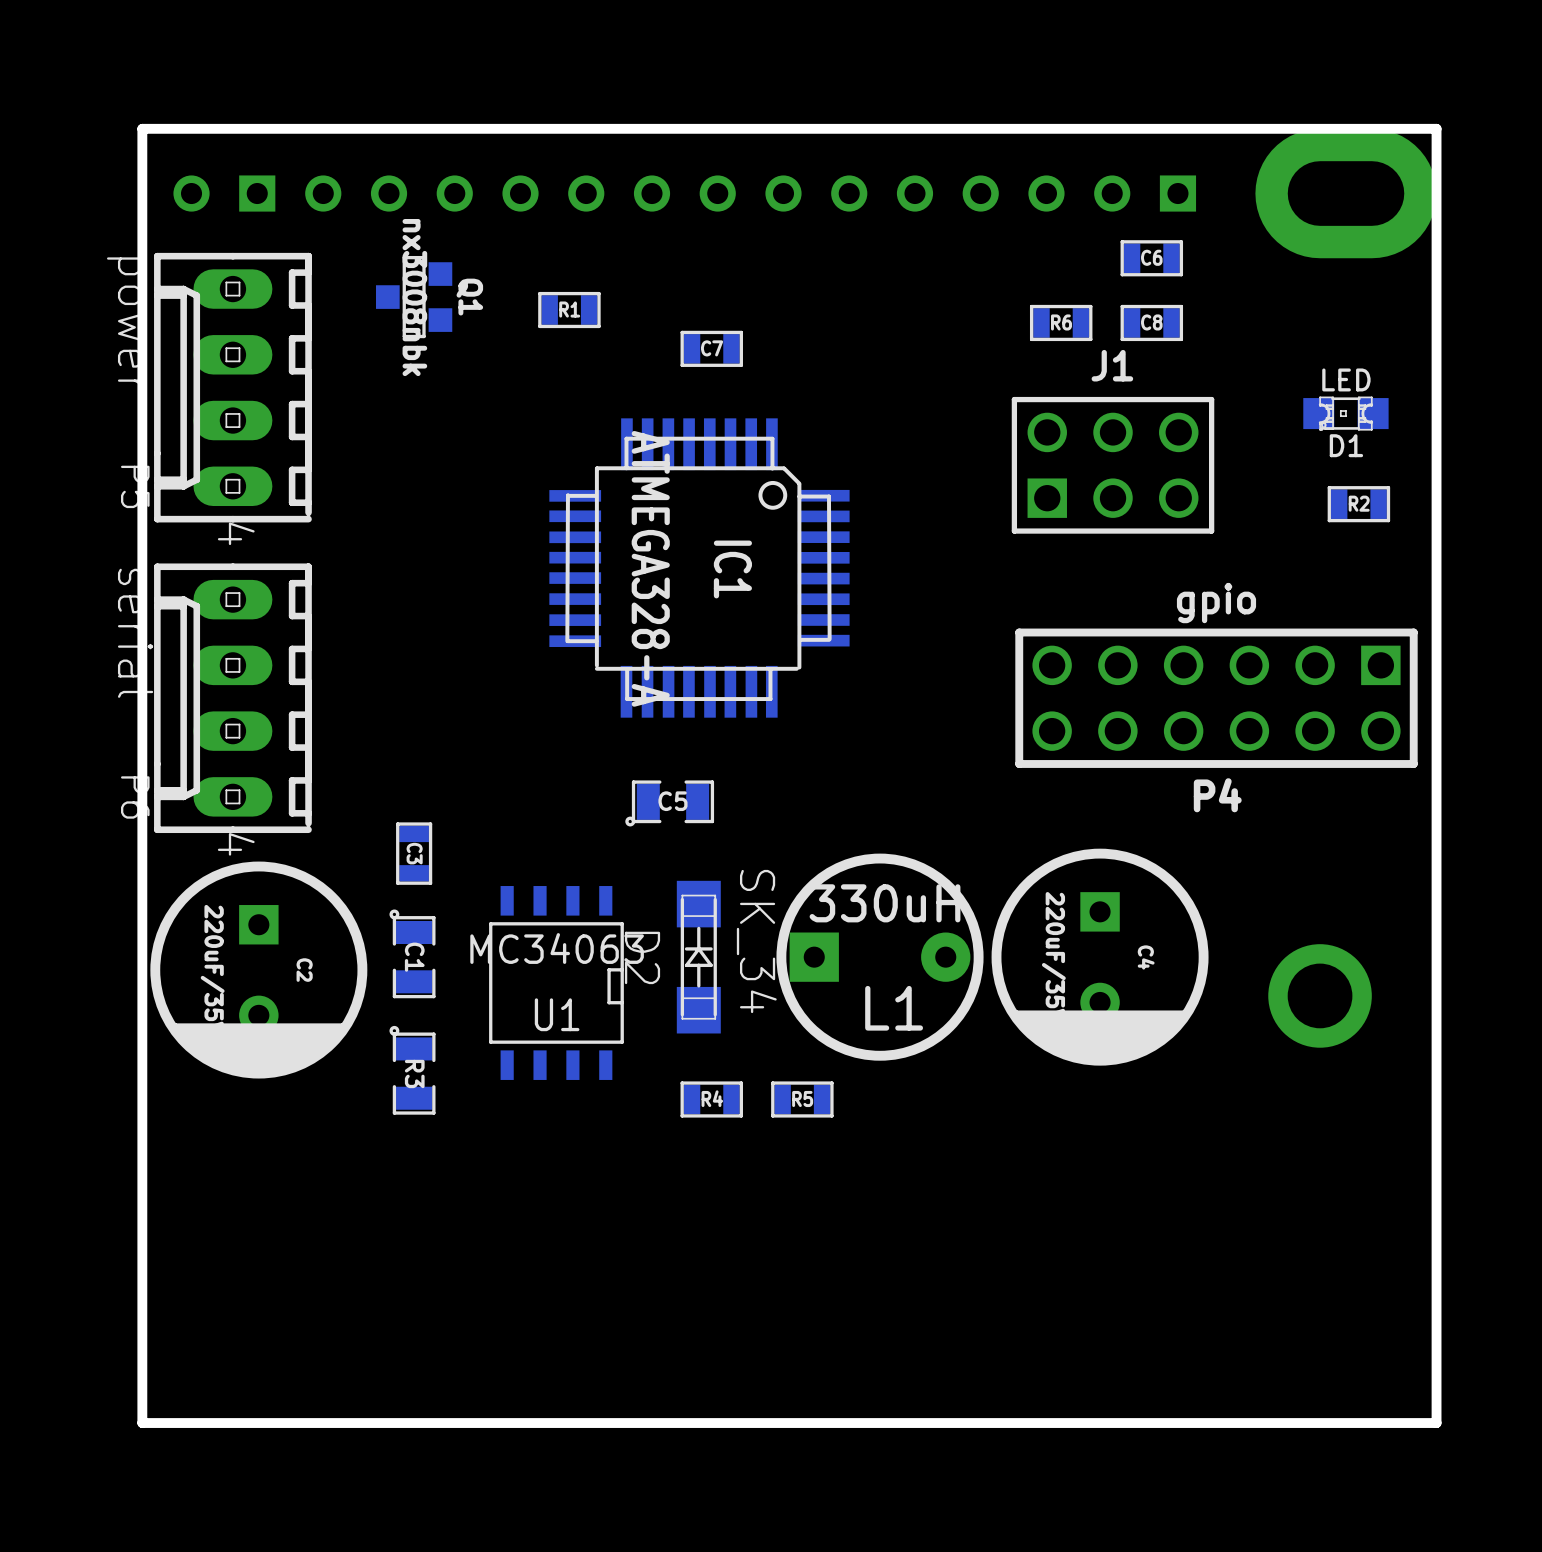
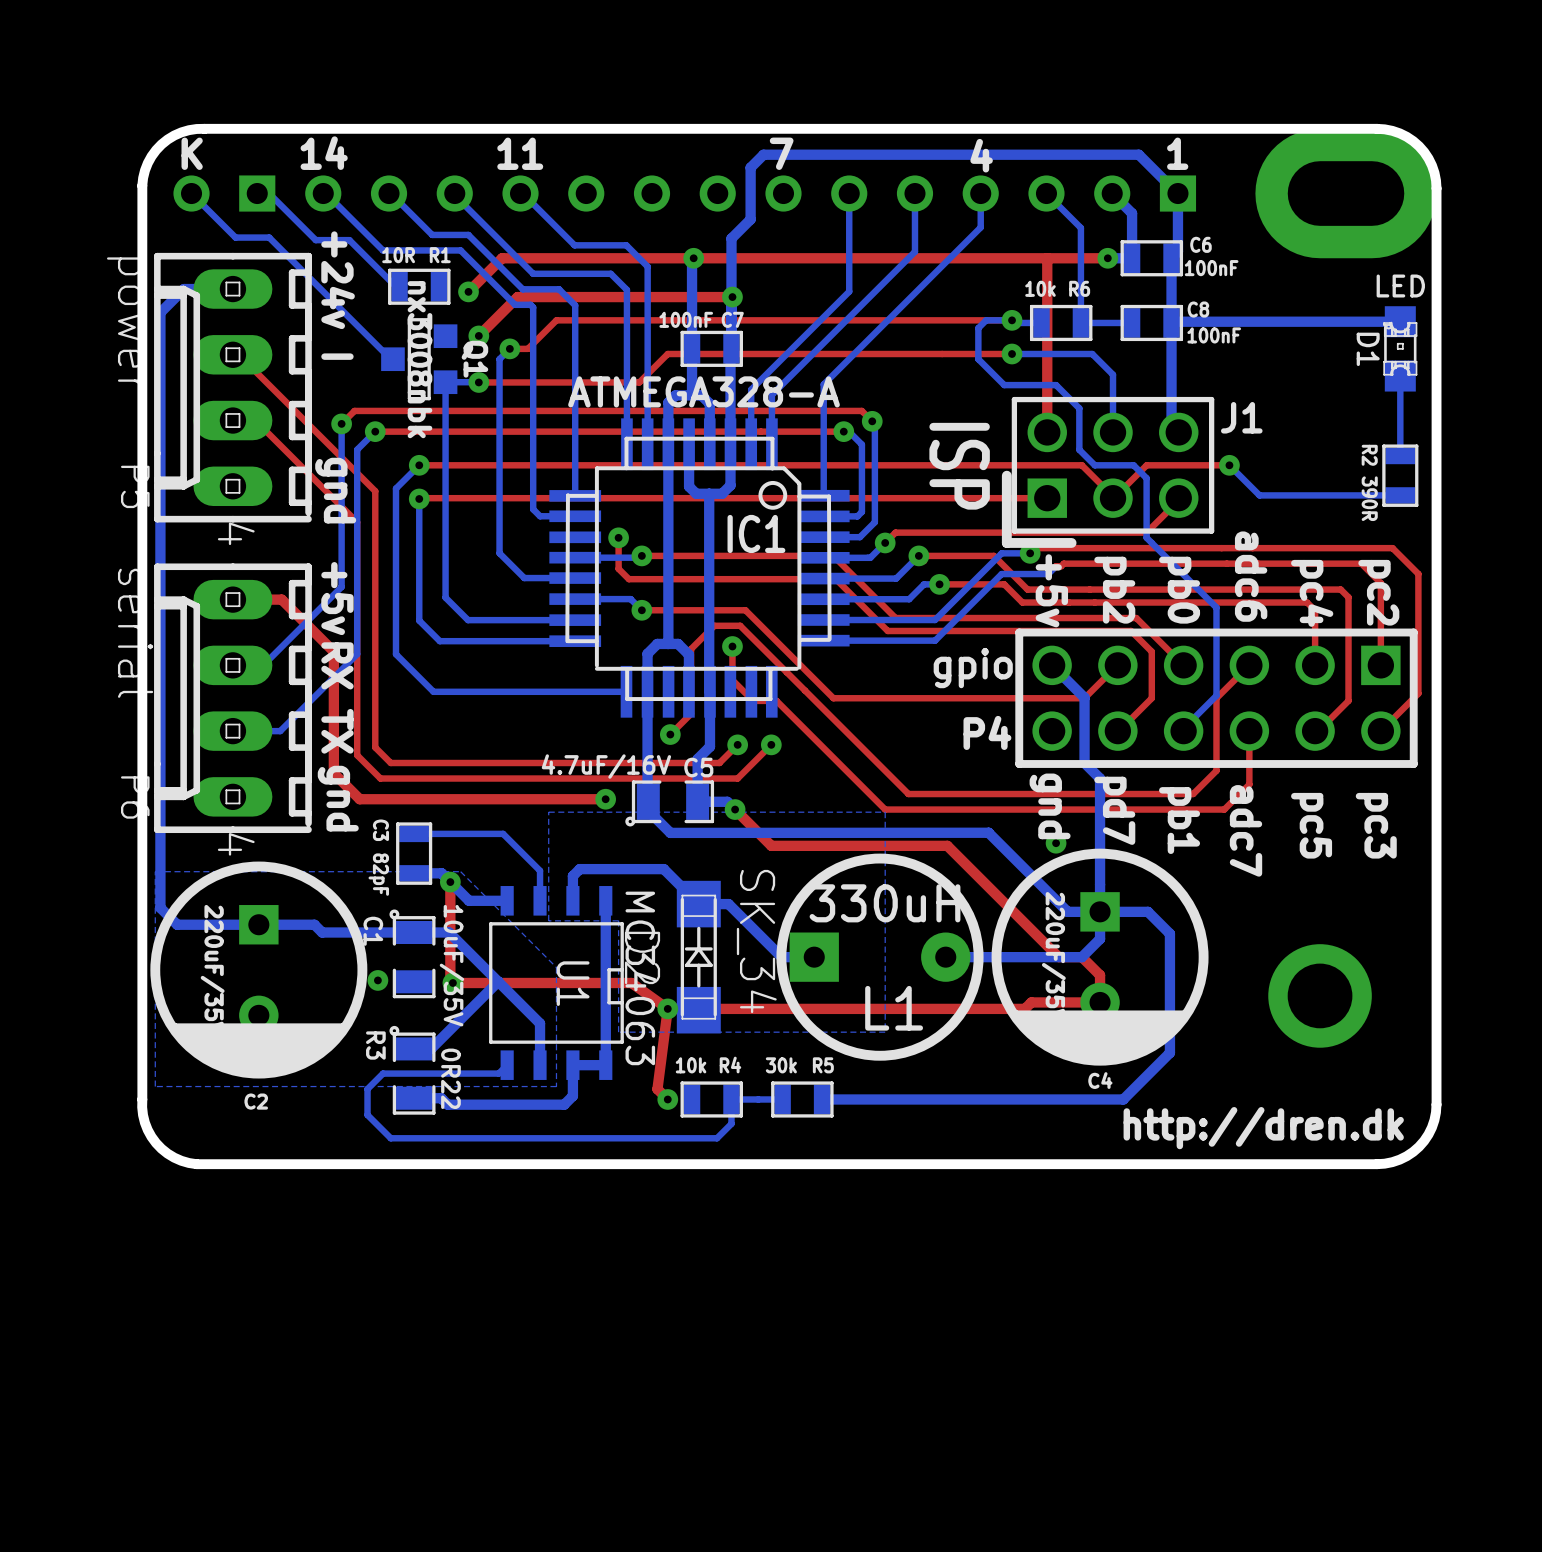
board edge: (204, 128) (142, 128) (142, 185) -> (204, 128) (181, 132) (161, 144) (147, 163) (142, 185)
board edge: (1376, 128) (1436, 128) (1436, 188) -> (1376, 128) (1399, 133) (1419, 146) (1432, 165) (1436, 188)
text: none -> K (192, 153)
text: none -> 14 (324, 153)
text: none -> 11 (520, 153)
text: none -> 7 (781, 153)
text: none -> 1 (1177, 153)
text: none -> 4 (981, 155)
bottom track: none -> (191, 193) (235, 237) (269, 237) (392, 359)
bottom track: none -> (257, 193) (269, 193) (315, 240) (349, 240) (396, 286) (399, 286)
bottom track: none -> (323, 193) (326, 193) (382, 250) (460, 250) (515, 304) (530, 304) (533, 307) (533, 509) (540, 516) (575, 516)
bottom track: none -> (389, 193) (432, 234) (468, 234) (522, 289) (559, 289) (575, 305) (575, 495)
bottom track: none -> (454, 193) (533, 273) (610, 273) (626, 289) (626, 444)
bottom track: none -> (520, 193) (522, 193) (574, 245) (626, 245) (647, 266) (647, 444)
bottom track: none -> (849, 193) (849, 291) (751, 389) (751, 444)
bottom track: none -> (914, 193) (914, 251) (771, 394) (771, 444)
bottom track: none -> (980, 193) (980, 227) (823, 384) (823, 495)
bottom track: none -> (1046, 193) (1080, 227) (1080, 322) (1132, 322)
bottom track: none -> (1112, 193) (1132, 213) (1132, 258) (1107, 258)
bottom track: none -> (1177, 193) (1177, 251) (1171, 258) (1171, 425) (1178, 432)
bottom track: none -> (1177, 193) (1138, 154) (763, 154) (750, 167) (750, 219) (731, 238) (730, 485) (722, 493) (696, 493) (689, 486) (689, 444)
R1 value: none -> 10R (398, 255)
C6 name position: C6 (1151, 257) -> C6 (1200, 244)
bottom track: none -> (693, 258) (692, 259) (692, 393) (693, 395)
via: none -> (693, 258)
top track: none -> (1047, 258) (1047, 432)
top track: none -> (1107, 258) (502, 258) (468, 291)
via: none -> (1107, 258)
C6 value: none -> 100nF (1211, 268)
text: none -> +24v (338, 280)
R6 value: none -> 10k (1040, 288)
bottom track: none -> (232, 289) (184, 289) (160, 312) (160, 907) (177, 924) (314, 924) (322, 932) (449, 932) (540, 1023) (540, 1065)
via: none -> (468, 291)
Q1 position: (414, 297) -> (419, 359)
top track: none -> (732, 297) (517, 297) (478, 335)
via: none -> (732, 297)
R1 name position: R1 (569, 309) -> R1 (440, 255)
R1 position: (569, 310) -> (419, 286)
C7 value: none -> 100nF (686, 319)
top track: none -> (1012, 320) (556, 320) (527, 348) (509, 348)
via: none -> (1012, 320)
bottom track: none -> (1400, 321) (1171, 322)
bottom track: none -> (1041, 322) (986, 320) (978, 328) (978, 359) (1004, 385) (1056, 385) (1079, 408) (1079, 449) (1094, 465) (1133, 465) (1146, 478) (1146, 537) (1216, 607) (1216, 695) (1183, 728) (1183, 731)
R6 name position: R6 (1061, 322) -> R6 (1079, 288)
C8 name position: C8 (1151, 322) -> C8 (1198, 309)
via: none -> (478, 335)
C8 value: none -> 100nF (1214, 335)
bottom track: none -> (509, 348) (499, 359) (499, 553) (524, 578) (575, 578)
via: none -> (509, 348)
C7 name position: C7 (712, 348) -> C7 (732, 319)
top track: none -> (232, 354) (238, 354) (375, 491) (375, 747) (390, 763) (719, 763) (737, 744)
bottom track: none -> (1012, 354) (1092, 354) (1113, 374) (1113, 432)
top track: none -> (1012, 354) (667, 354) (639, 382) (478, 382)
via: none -> (1012, 354)
text: none -> I (337, 356)
J1 name position: J1 (1112, 365) -> J1 (1241, 417)
bottom track: none -> (1400, 376) (1400, 455)
bottom track: none -> (478, 382) (445, 382) (445, 597) (468, 620) (575, 620)
via: none -> (478, 382)
D1 rotation: 0° (1345, 413) -> 90° clockwise (1400, 348)
D1 position: (1345, 413) -> (1400, 348)
top track: none -> (232, 420) (255, 420) (357, 522) (357, 755) (380, 778) (737, 778) (771, 744)
bottom track: none -> (872, 421) (874, 423) (874, 522) (859, 537) (823, 537)
top track: none -> (872, 421) (861, 410) (354, 410) (341, 423)
via: none -> (872, 421)
bottom track: none -> (341, 423) (341, 587) (263, 665) (232, 665)
via: none -> (341, 423)
bottom track: none -> (375, 431) (357, 449) (357, 654) (280, 731) (232, 731)
via: none -> (375, 431)
bottom track: none -> (843, 431) (848, 431) (861, 444) (861, 511) (857, 516) (823, 516)
top track: none -> (843, 431) (375, 431)
via: none -> (843, 431)
bottom track: none -> (709, 444) (709, 403) (701, 395) (675, 395) (668, 402) (668, 643)
bottom track: none -> (419, 465) (395, 488) (395, 654) (433, 691) (626, 691)
via: none -> (419, 465)
bottom track: none -> (1229, 465) (1259, 495) (1400, 495)
top track: none -> (1229, 465) (1146, 465) (1113, 498) (1081, 465) (419, 465)
via: none -> (1229, 465)
text: none -> ISP (959, 466)
line: none -> (1006, 475) (1006, 542) (1071, 542)
text: none -> gnd (335, 490)
bottom track: none -> (709, 493) (709, 746) (697, 759) (697, 801) (727, 801) (735, 809)
bottom track: none -> (419, 498) (419, 620) (439, 641) (575, 641)
via: none -> (419, 498)
top track: none -> (1047, 498) (419, 498)
top track: none -> (1178, 498) (1178, 500) (1146, 532) (895, 532) (885, 542)
R2 value: none -> 390R (1369, 498)
R2 rotation: 0° (1358, 504) -> 90° clockwise (1400, 475)
R2 position: (1358, 504) -> (1400, 475)
top track: none -> (618, 537) (618, 568) (628, 579) (835, 579) (887, 630) (1131, 630) (1151, 651) (1151, 698) (1117, 731)
via: none -> (618, 537)
bottom track: none -> (885, 542) (870, 557) (823, 557)
via: none -> (885, 542)
bottom track: none -> (1030, 553) (1001, 553) (935, 620) (823, 620)
top track: none -> (1030, 553) (1035, 548) (1392, 548) (1418, 573) (1418, 693) (1380, 731)
via: none -> (1030, 553)
bottom track: none -> (641, 555) (640, 557) (575, 557)
top track: none -> (641, 555) (833, 555) (895, 618) (1136, 618) (1183, 665)
via: none -> (641, 555)
bottom track: none -> (918, 555) (896, 578) (823, 578)
via: none -> (918, 555)
top track: none -> (924, 561) (918, 555) (993, 555) (1027, 589) (1340, 589) (1348, 597) (1348, 700) (1318, 731) (1315, 731)
IC1 value rotation: 0° (650, 568) -> 90° counterclockwise (704, 391)
bottom track: none -> (1053, 568) (1048, 574) (1001, 574) (935, 640) (823, 640)
top track: none -> (1053, 568) (1063, 563) (1361, 563) (1380, 583) (1380, 665)
IC1 name rotation: 0° (732, 569) -> 90° counterclockwise (756, 533)
text: none -> adc6 (1251, 576)
bottom track: none -> (939, 584) (924, 584) (909, 599) (823, 599)
top track: none -> (939, 584) (1004, 584) (1022, 602) (1307, 602) (1315, 610) (1315, 665)
via: none -> (939, 584)
text: none -> +5v (1051, 590)
text: none -> pb2 (1114, 590)
text: none -> pb0 (1179, 590)
text: none -> pc2 (1378, 592)
text: none -> pc4 (1312, 593)
text: none -> +5v (337, 598)
top track: none -> (232, 599) (281, 599) (333, 651) (333, 773) (359, 799) (605, 799)
bottom track: none -> (575, 599) (630, 599) (641, 610)
P4 value position: gpio (1216, 603) -> gpio (973, 668)
top track: none -> (641, 610) (745, 610) (833, 698) (1084, 698) (1117, 665)
via: none -> (641, 610)
top track: none -> (732, 646) (732, 680) (753, 700) (776, 700) (885, 809) (1224, 809) (1249, 784) (1249, 731)
via: none -> (732, 646)
text: none -> RX (337, 665)
bottom track: none -> (1052, 665) (1084, 697) (1084, 763) (1100, 778) (1100, 939) (1081, 957) (945, 957)
top track: none -> (1249, 665) (1216, 698) (1216, 770) (1193, 794) (908, 794) (740, 625) (714, 625) (691, 649) (691, 713) (670, 734)
bottom track: none -> (688, 691) (688, 654) (678, 643) (657, 643) (647, 653) (647, 801) (648, 810) (670, 832) (988, 832) (1067, 911) (1147, 911) (1169, 933) (1169, 1052) (1123, 1099) (822, 1099)
text: none -> TX (337, 731)
via: none -> (670, 734)
via: none -> (737, 744)
via: none -> (771, 744)
C5 value: none -> 4.7uF/16V (606, 766)
P4 name position: P4 (1217, 795) -> P4 (987, 732)
text: none -> gnd (338, 798)
via: none -> (605, 799)
C5 name position: C5 (672, 801) -> C5 (698, 767)
text: none -> gnd (1050, 806)
top track: none -> (735, 809) (771, 845) (947, 845) (1058, 957) (1081, 957) (1100, 975) (1100, 1002) (1031, 1002) (1024, 1008) (667, 1008)
via: none -> (735, 809)
text: none -> pd7 (1114, 810)
bottom zone outline: none -> (885, 812) (548, 812) (548, 920) (618, 920) (618, 1032) (885, 1032) (885, 812)
text: none -> pb1 (1179, 820)
text: none -> pc5 (1311, 825)
text: none -> pc3 (1376, 825)
text: none -> adc7 (1245, 830)
bottom track: none -> (414, 833) (503, 833) (540, 870) (540, 900)
via: none -> (1056, 843)
C3 name position: C3 (414, 853) -> C3 (380, 830)
bottom zone outline: none -> (460, 871) (155, 871) (155, 1086) (556, 1086) (556, 967) (460, 871)
bottom track: none -> (414, 873) (441, 873) (469, 900) (507, 900)
C3 value: none -> 82pF (378, 874)
top track: none -> (450, 882) (450, 980) (452, 982) (631, 982) (667, 1008)
via: none -> (450, 882)
bottom track: none -> (572, 900) (572, 876) (579, 869) (663, 869) (698, 904) (728, 904) (781, 957) (814, 957)
bottom track: none -> (605, 900) (605, 1065) (572, 1065) (572, 1096) (564, 1104) (447, 1104) (441, 1098) (414, 1098)
U1 value rotation: 0° (557, 948) -> 90° clockwise (640, 978)
C1 name position: C1 (414, 957) -> C1 (373, 931)
C4 name rotation: 0° (1146, 957) -> 90° counterclockwise (1100, 1080)
C4 name position: C4 (1146, 957) -> C4 (1100, 1080)
C1 value: none -> 10uF/35V (451, 965)
C2 name rotation: 0° (304, 970) -> 90° counterclockwise (256, 1101)
C2 name position: C2 (304, 970) -> C2 (256, 1101)
via: none -> (377, 980)
bottom track: none -> (498, 981) (431, 1048) (414, 1048)
via: none -> (452, 982)
top track: none -> (667, 1008) (657, 1089) (667, 1099)
via: none -> (667, 1008)
U1 name rotation: 0° (557, 1014) -> 90° clockwise (573, 983)
bottom track: none -> (507, 1065) (498, 1073) (383, 1073) (367, 1089) (367, 1115) (390, 1138) (717, 1138) (731, 1123) (731, 1099) (782, 1099)
R4 value: none -> 10k (691, 1065)
R5 value: none -> 30k (781, 1065)
R3 name position: R3 (414, 1073) -> R3 (375, 1045)
R3 value: none -> 0R22 (450, 1078)
R4 name position: R4 (712, 1098) -> R4 (730, 1065)
board edge: (142, 1099) (142, 1423) (1436, 1423) (1436, 1104) -> (142, 1099) (144, 1122) (156, 1143) (174, 1157) (196, 1164) (1376, 1164) (1399, 1159) (1419, 1146) (1431, 1127) (1436, 1104)
via: none -> (667, 1099)
R5 name position: R5 (802, 1099) -> R5 (823, 1065)
text: none -> http://dren.dk (1263, 1128)

